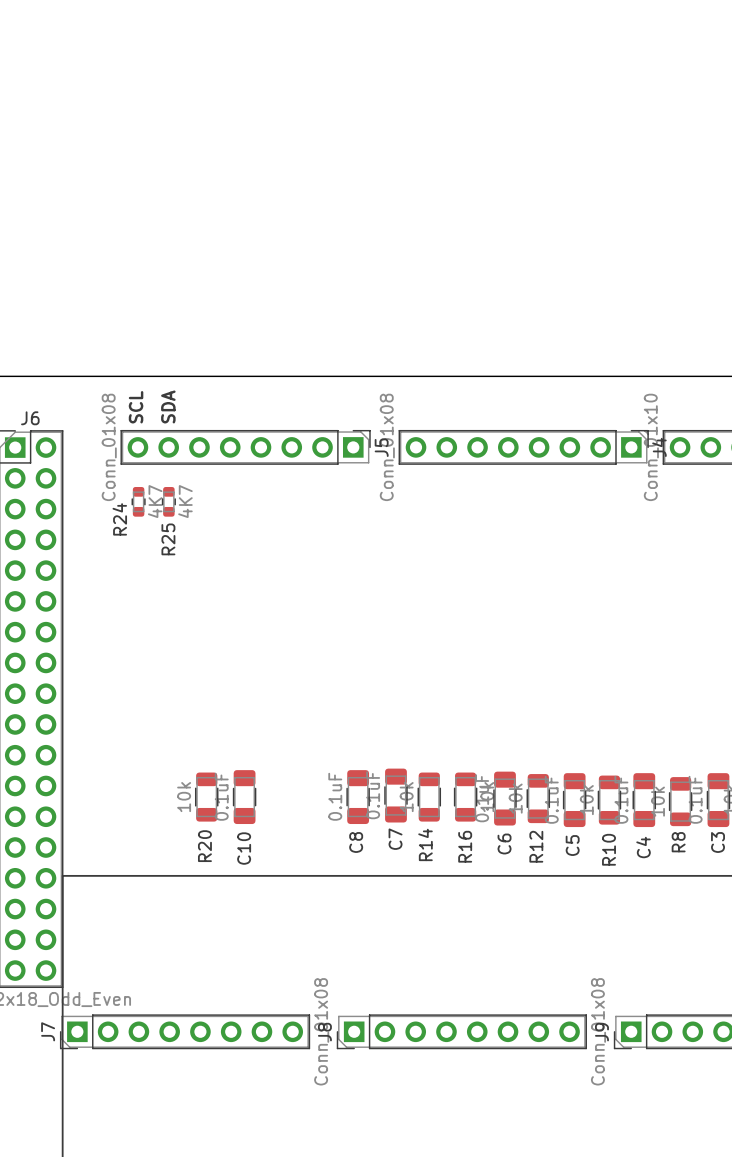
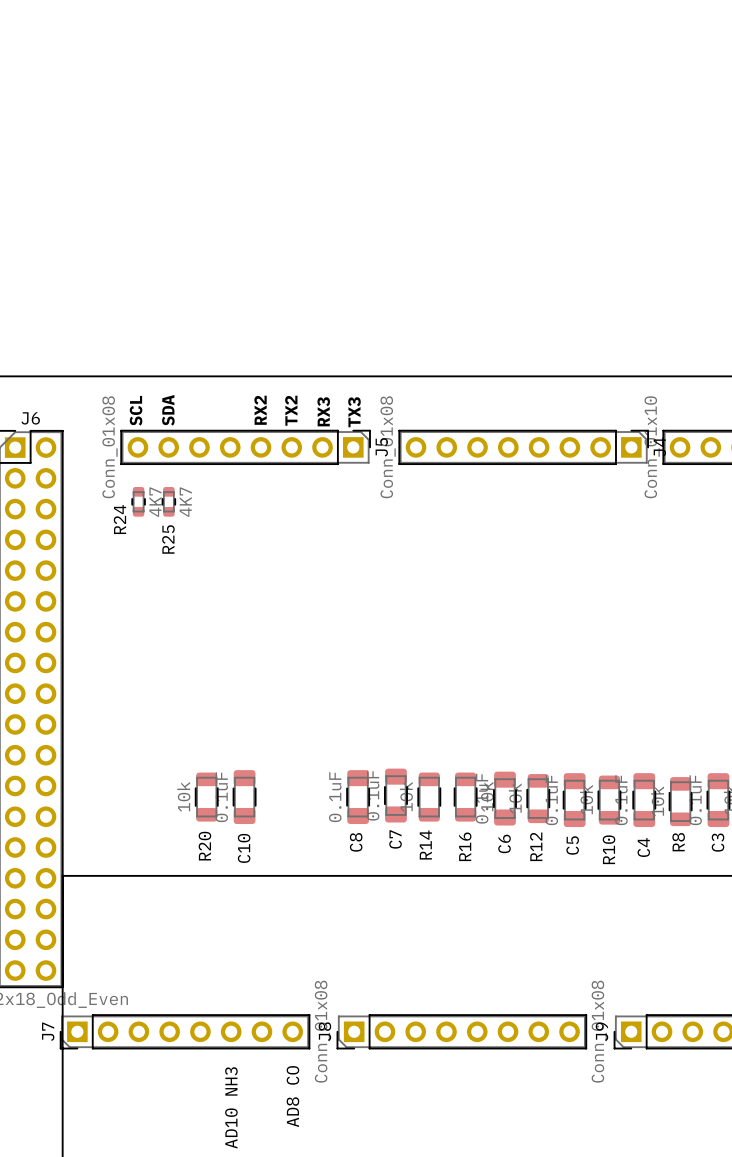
text: none -> RX2 (260, 410)
text: none -> TX2 (291, 410)
text: none -> RX3 (323, 411)
text: none -> TX3 (354, 412)
text: none -> AD8 CO (292, 1096)
text: none -> AD10 NH3 (231, 1107)

